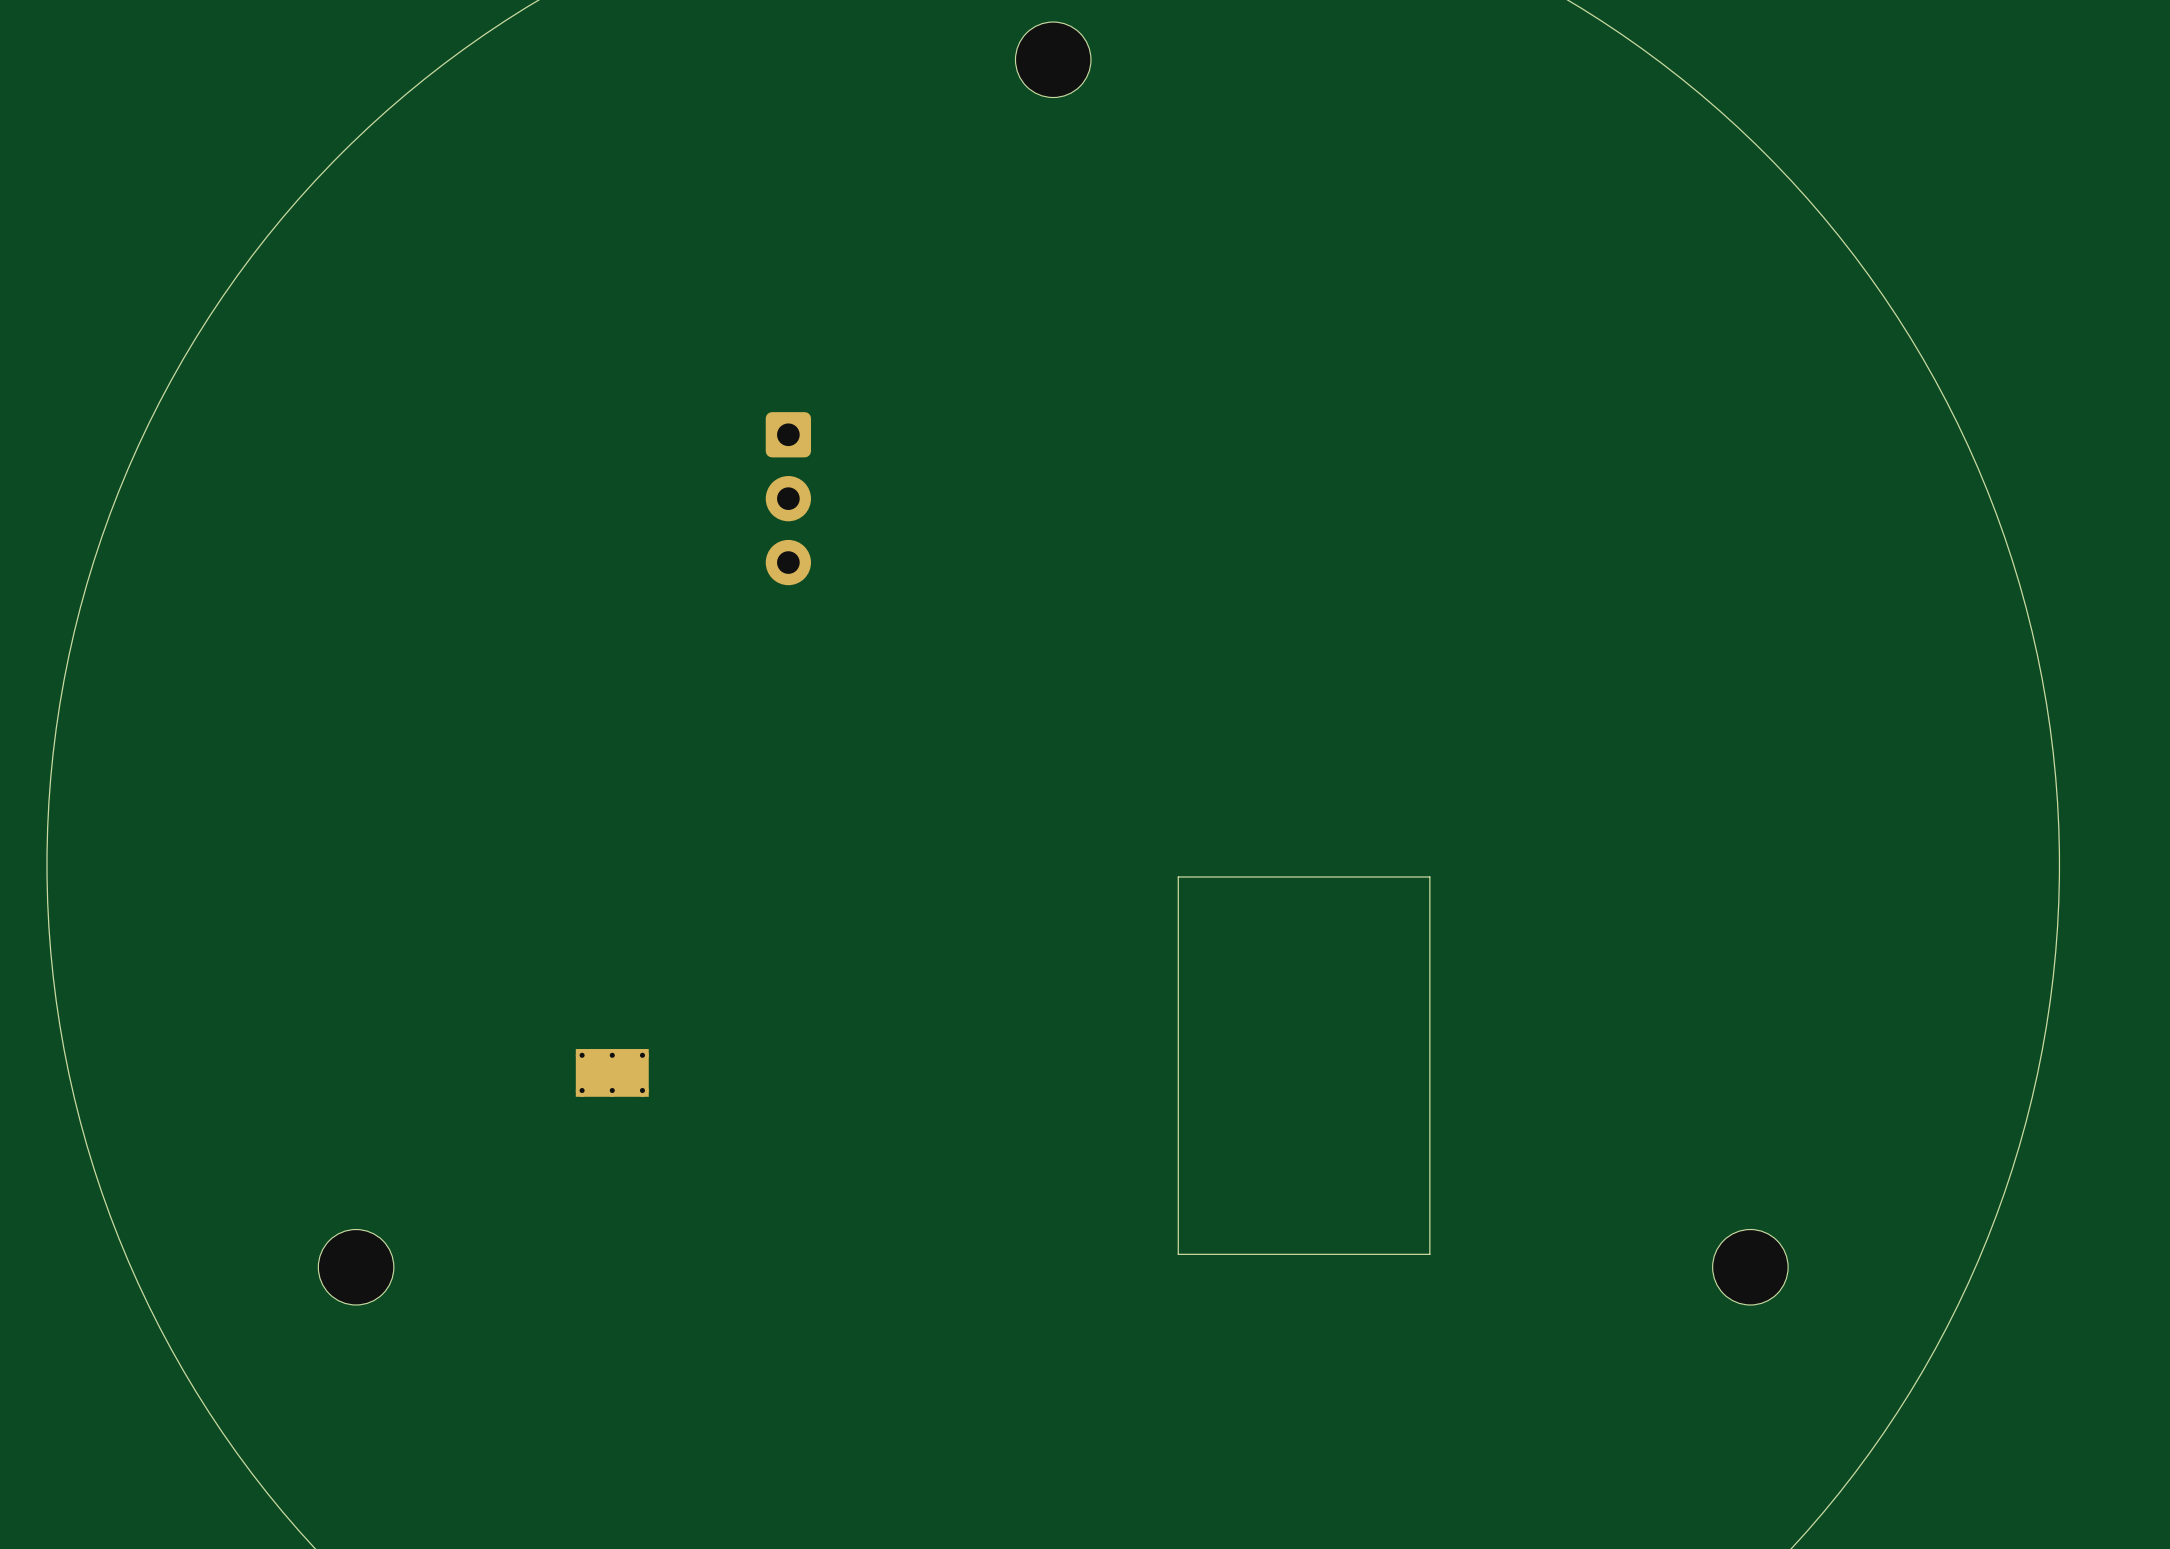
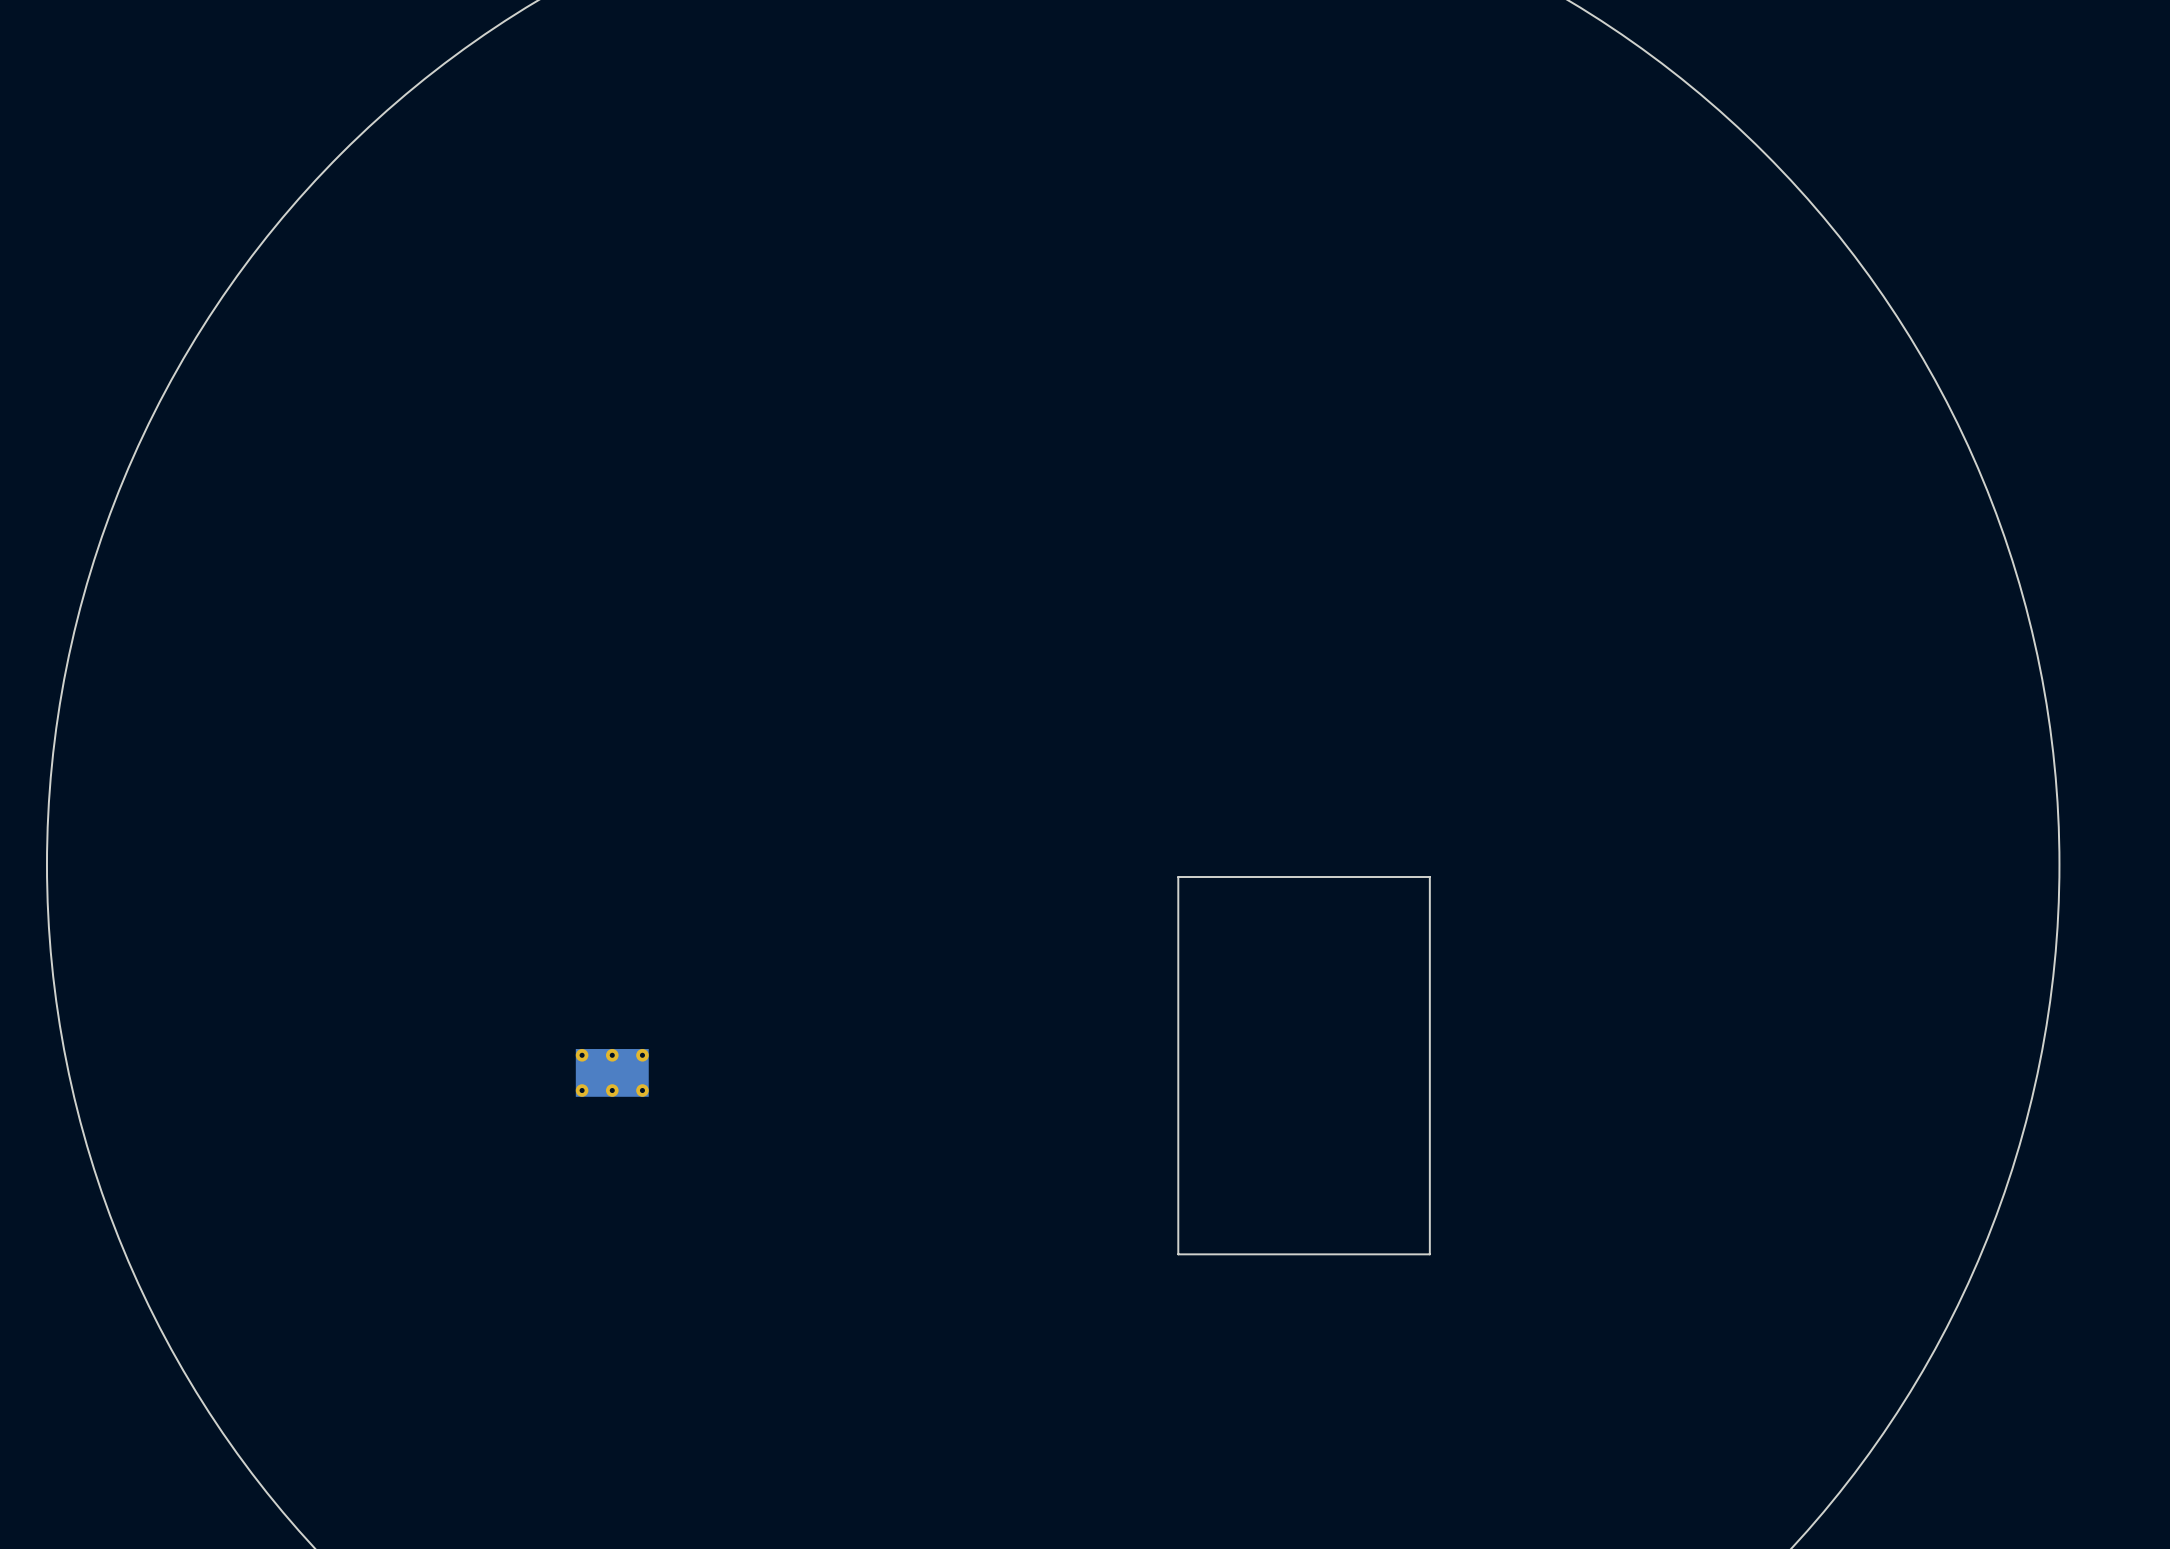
part: (1053, 59) -> none
part: (788, 498) -> none
part: (356, 1267) -> none
part: (1750, 1267) -> none

